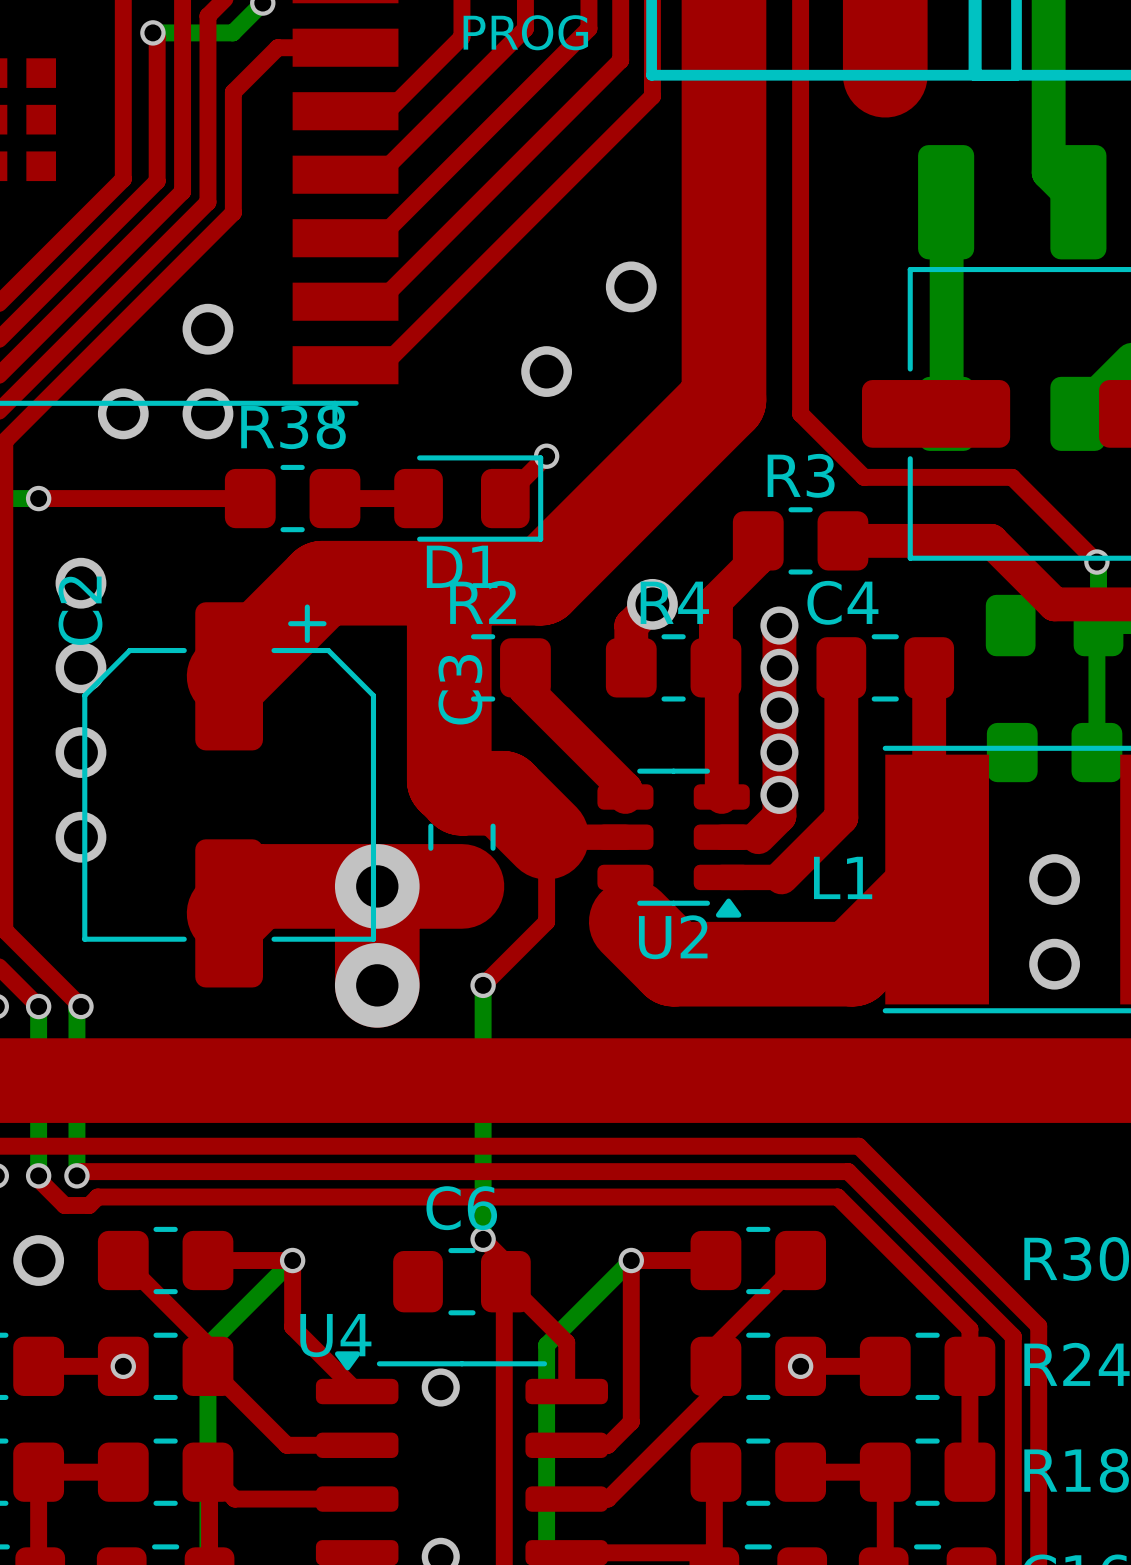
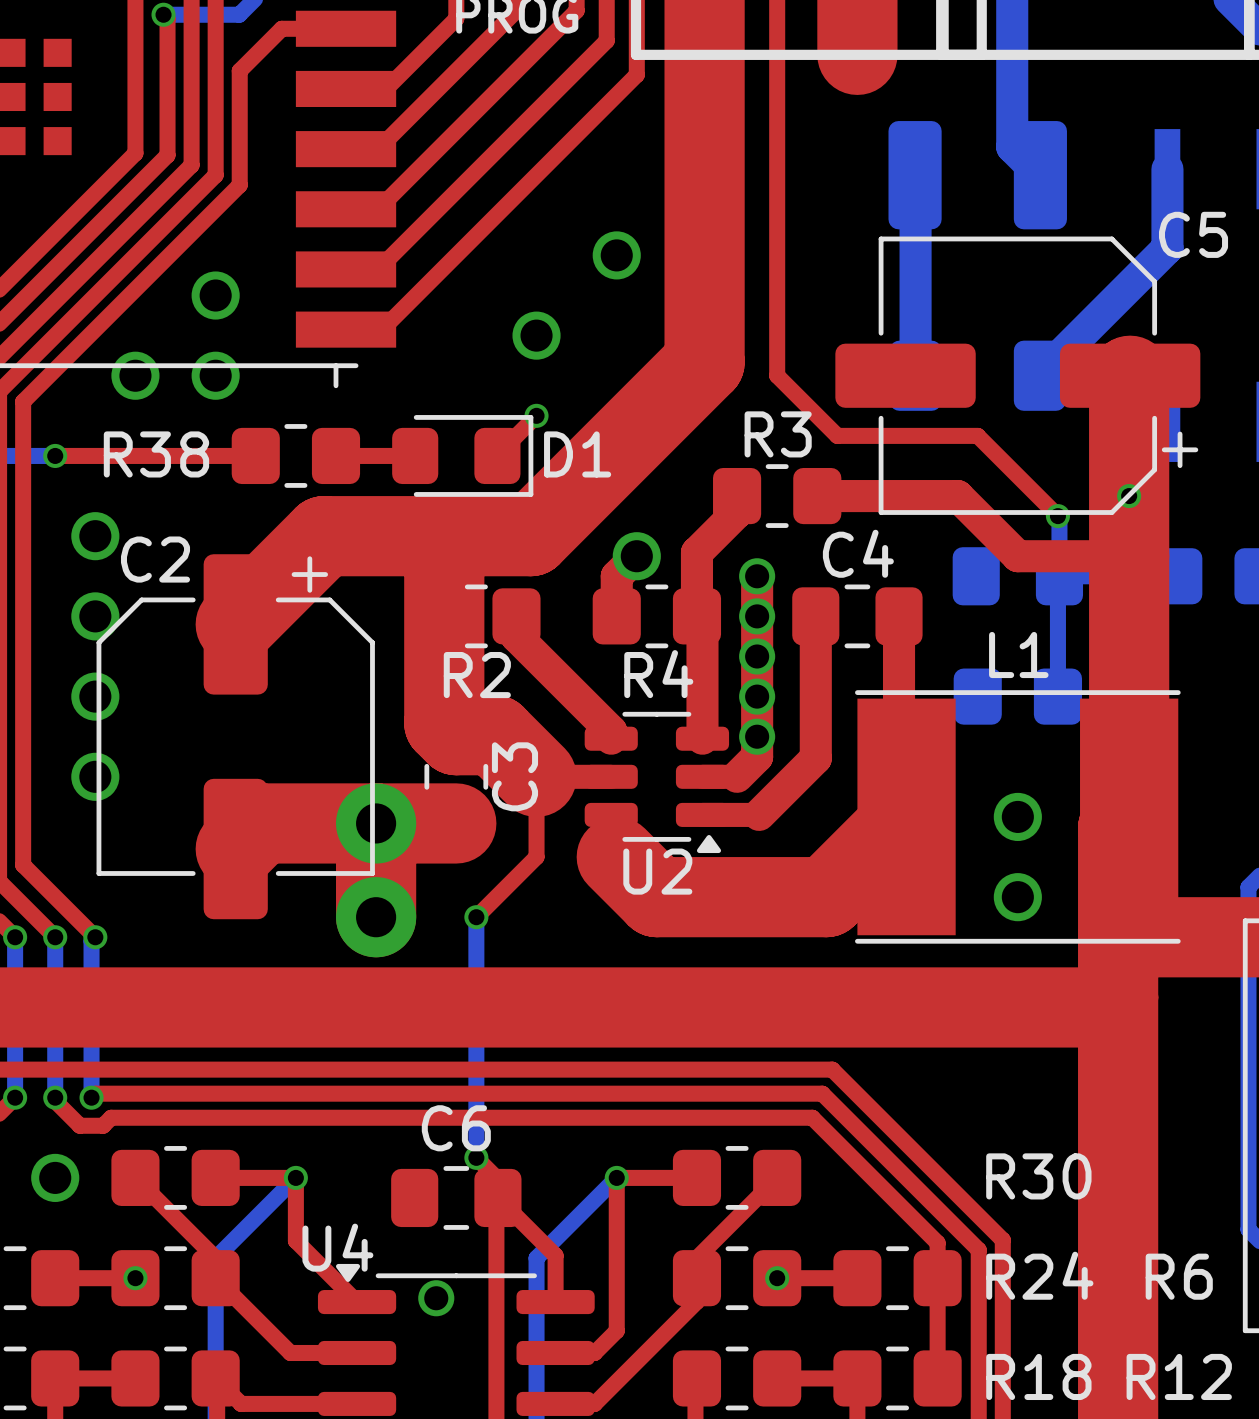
R38 name position: R38 (293, 427) -> R38 (156, 454)
D1 name position: D1 (462, 566) -> D1 (577, 454)
R2 name position: R2 (483, 602) -> R2 (477, 675)
R4 name position: R4 (674, 602) -> R4 (658, 674)
C4 name position: C4 (842, 602) -> C4 (858, 553)
C2 name rotation: 0° (80, 610) -> 90° clockwise (155, 559)
C3 name position: C3 (460, 689) -> C3 (514, 776)
L1 name position: L1 (843, 877) -> L1 (1018, 654)

